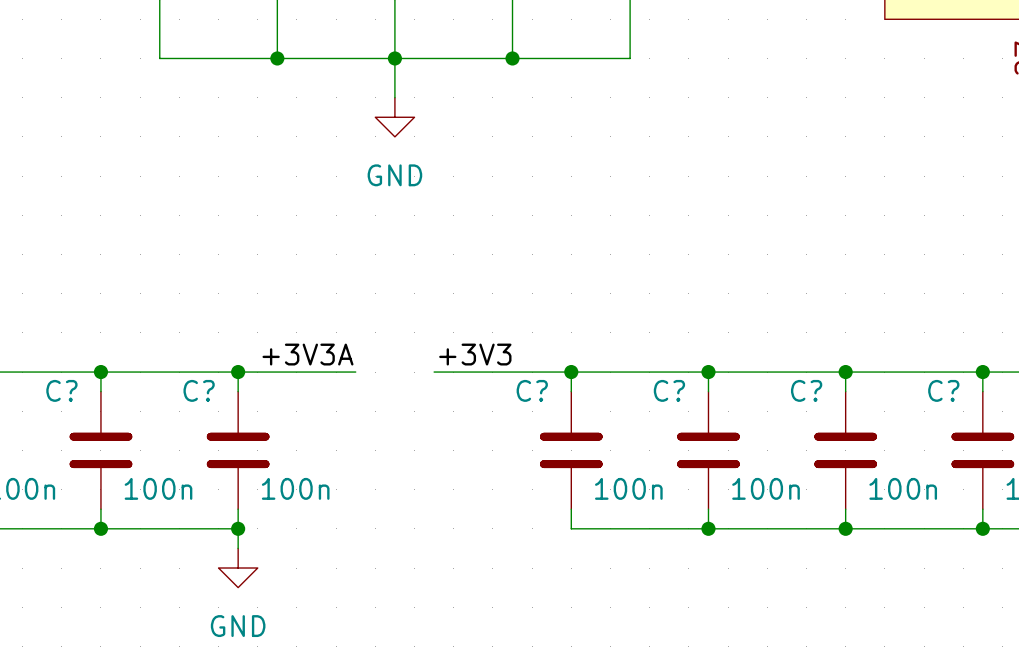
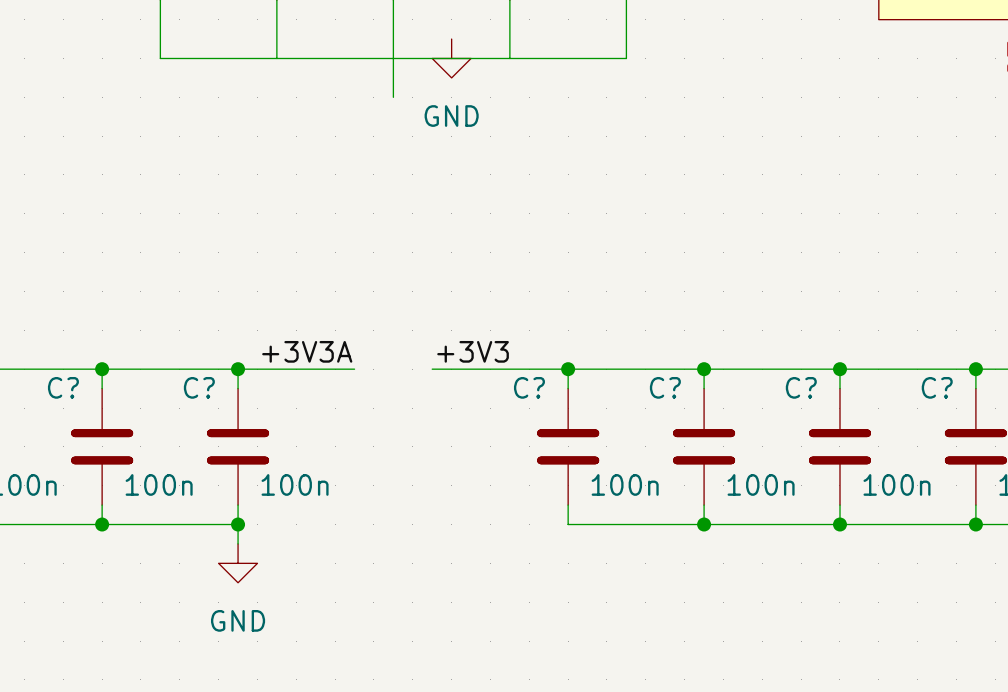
junction: (277, 58) -> none
junction: (394, 58) -> none
junction: (512, 58) -> none
power symbol position: GND (394, 117) -> GND (451, 58)

